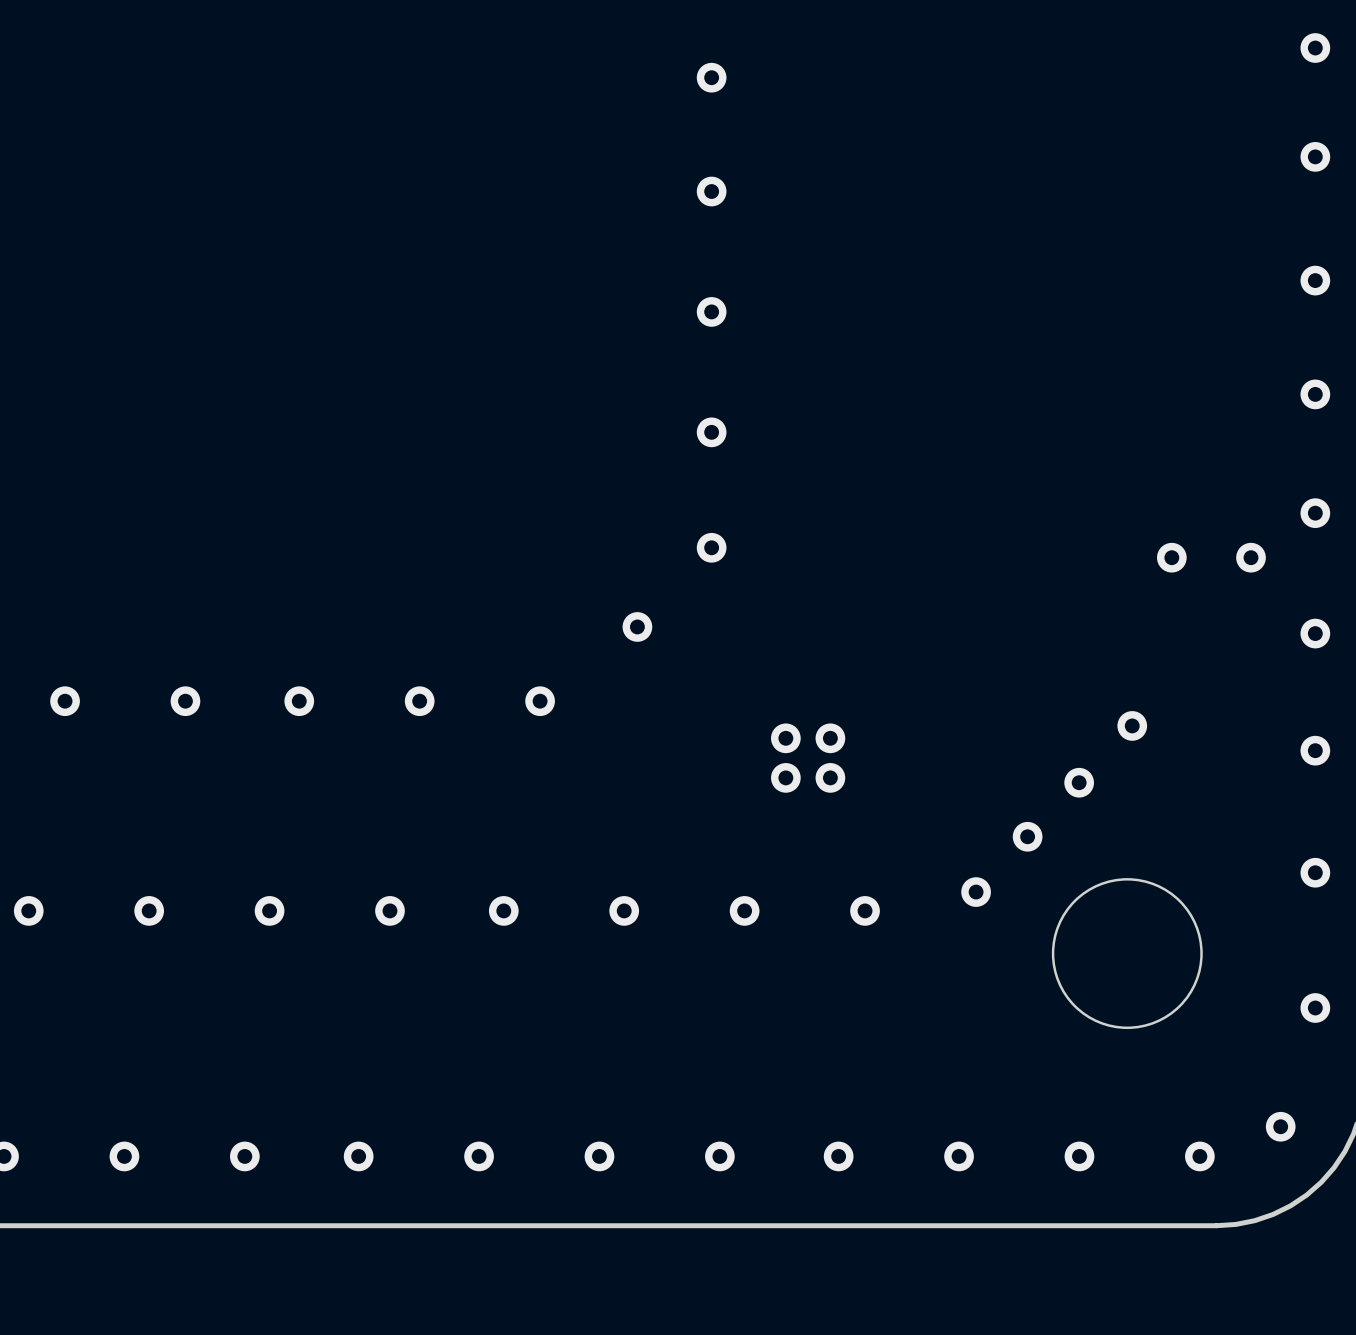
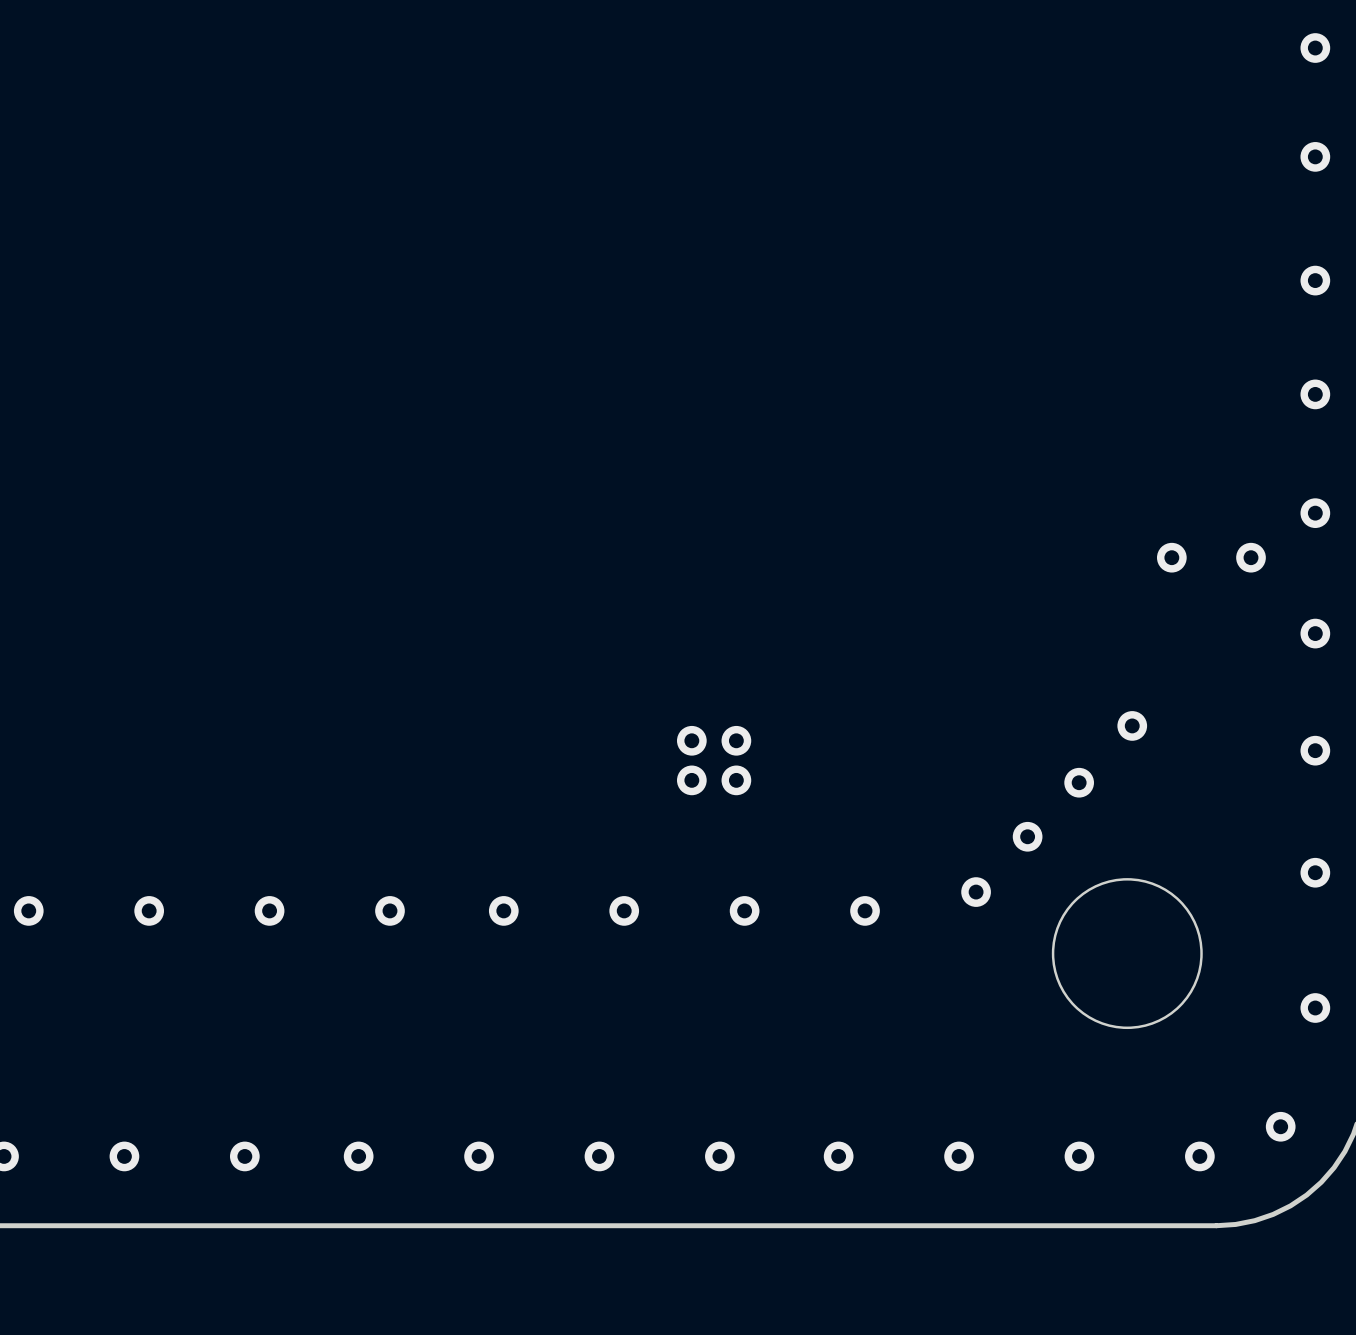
via: (711, 77) -> none
via: (711, 191) -> none
via: (711, 311) -> none
via: (711, 432) -> none
via: (711, 547) -> none
via: (637, 626) -> none
via: (65, 701) -> none
via: (185, 701) -> none
via: (299, 701) -> none
via: (419, 701) -> none
via: (540, 701) -> none
via: (785, 738) -> none
via: (830, 738) -> none
via: none -> (691, 740)
via: none -> (736, 740)
via: (785, 777) -> none
via: (830, 777) -> none
via: none -> (691, 780)
via: none -> (736, 780)

